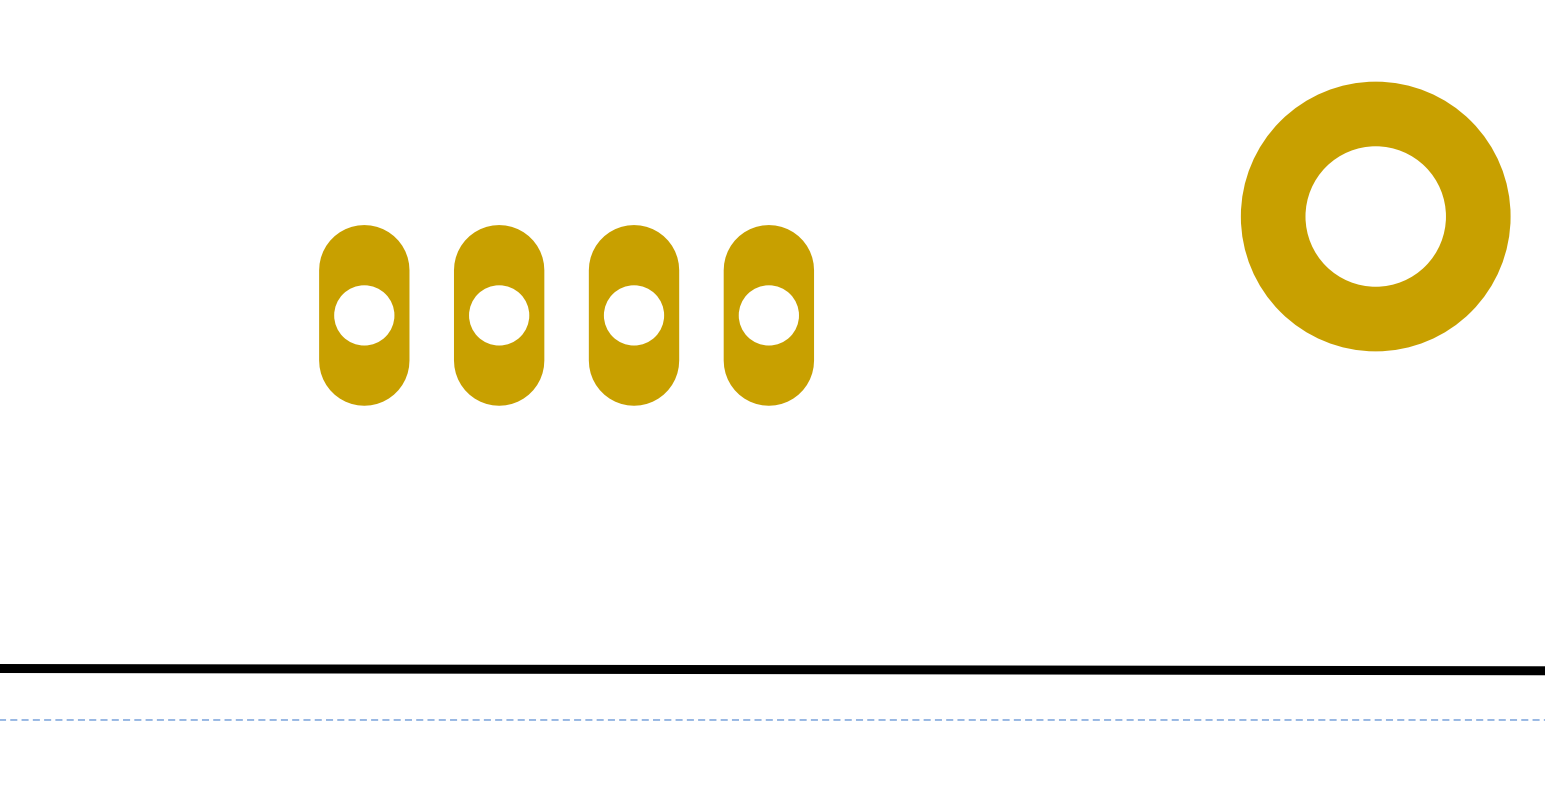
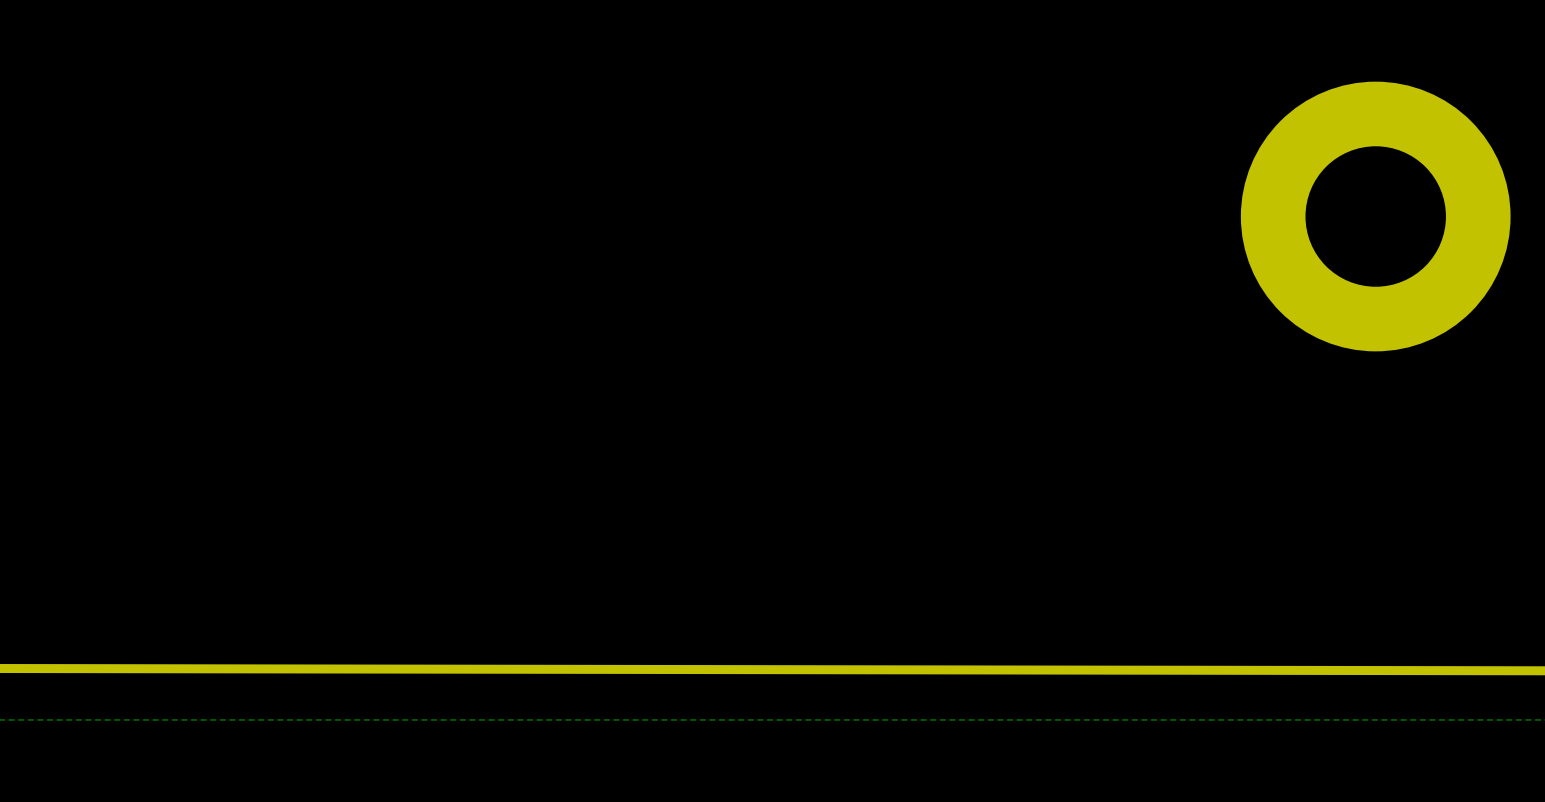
part: (431, 315) -> none
part: (701, 315) -> none

